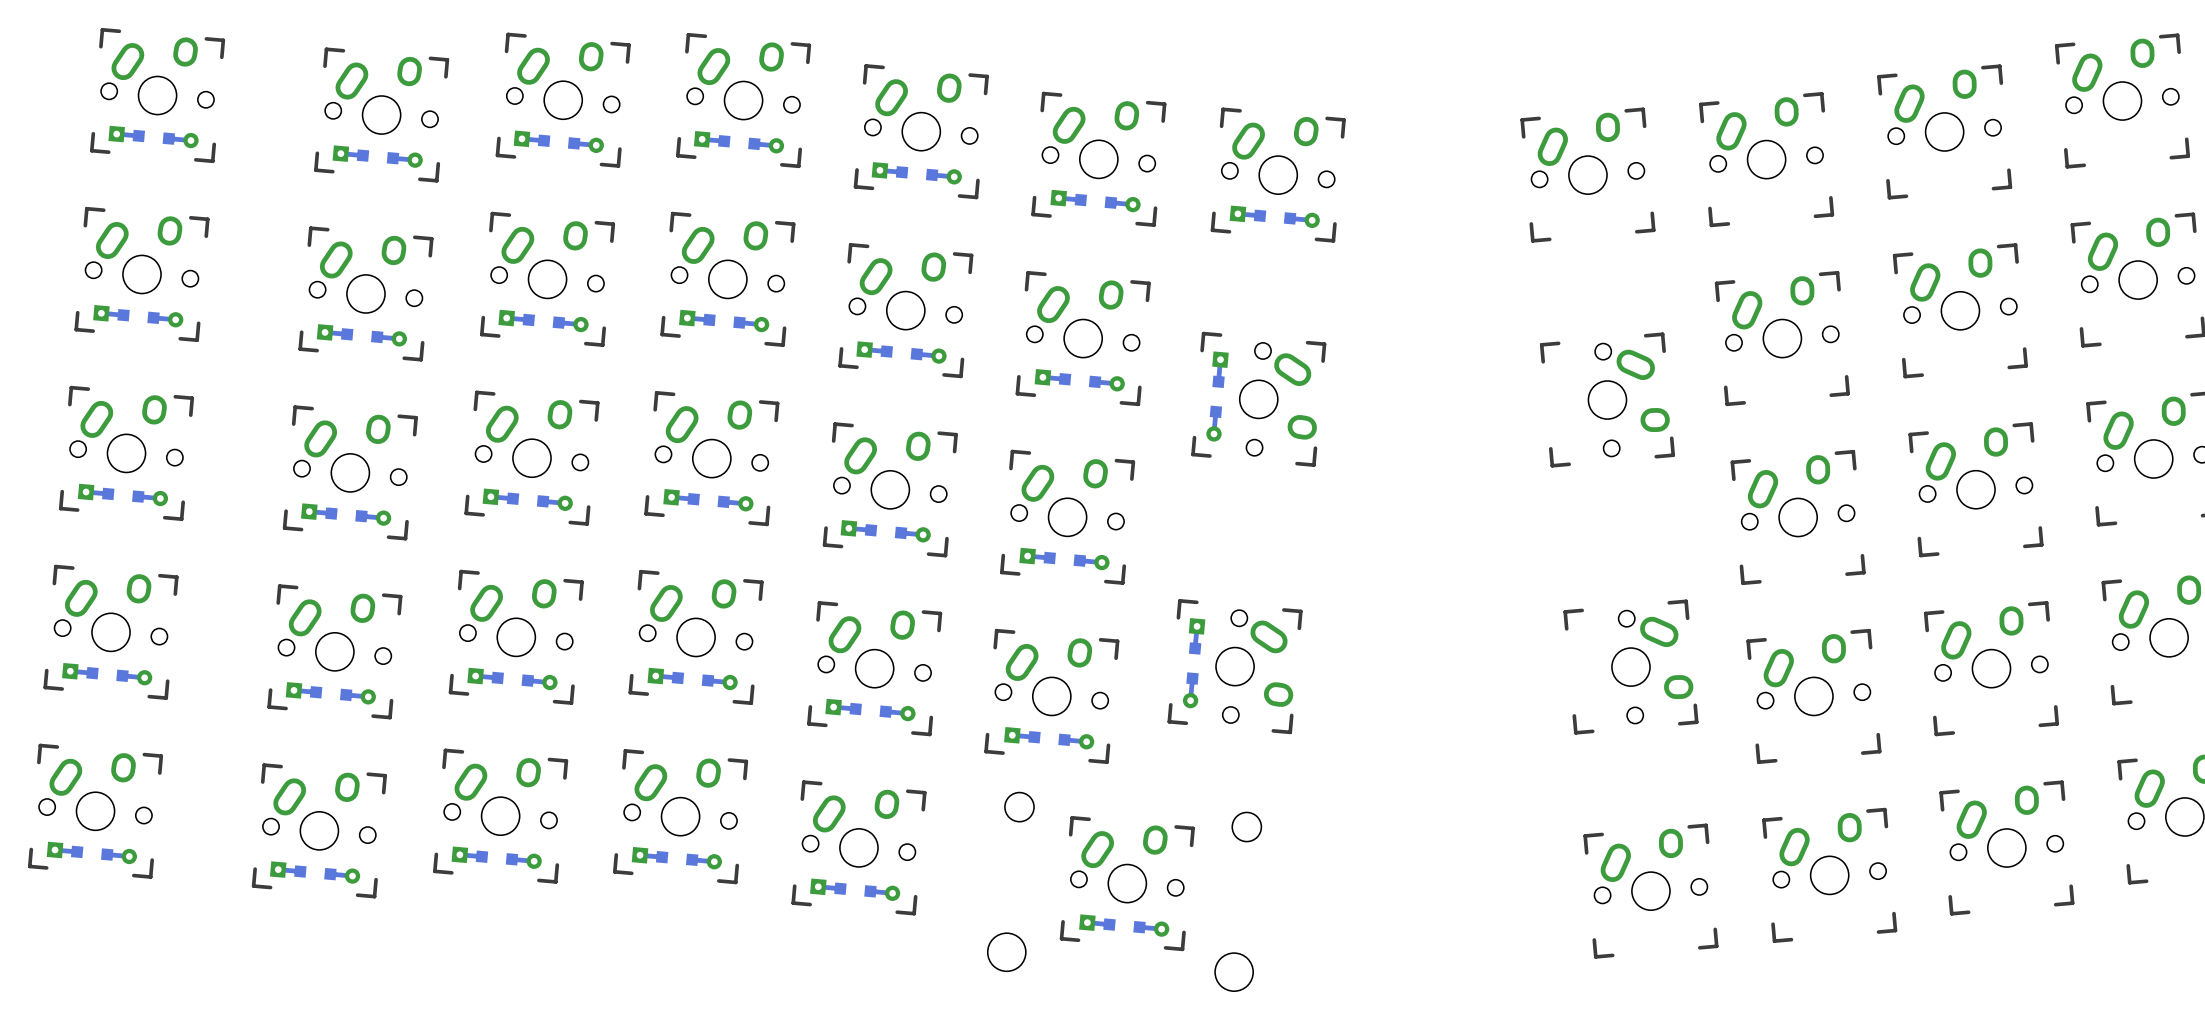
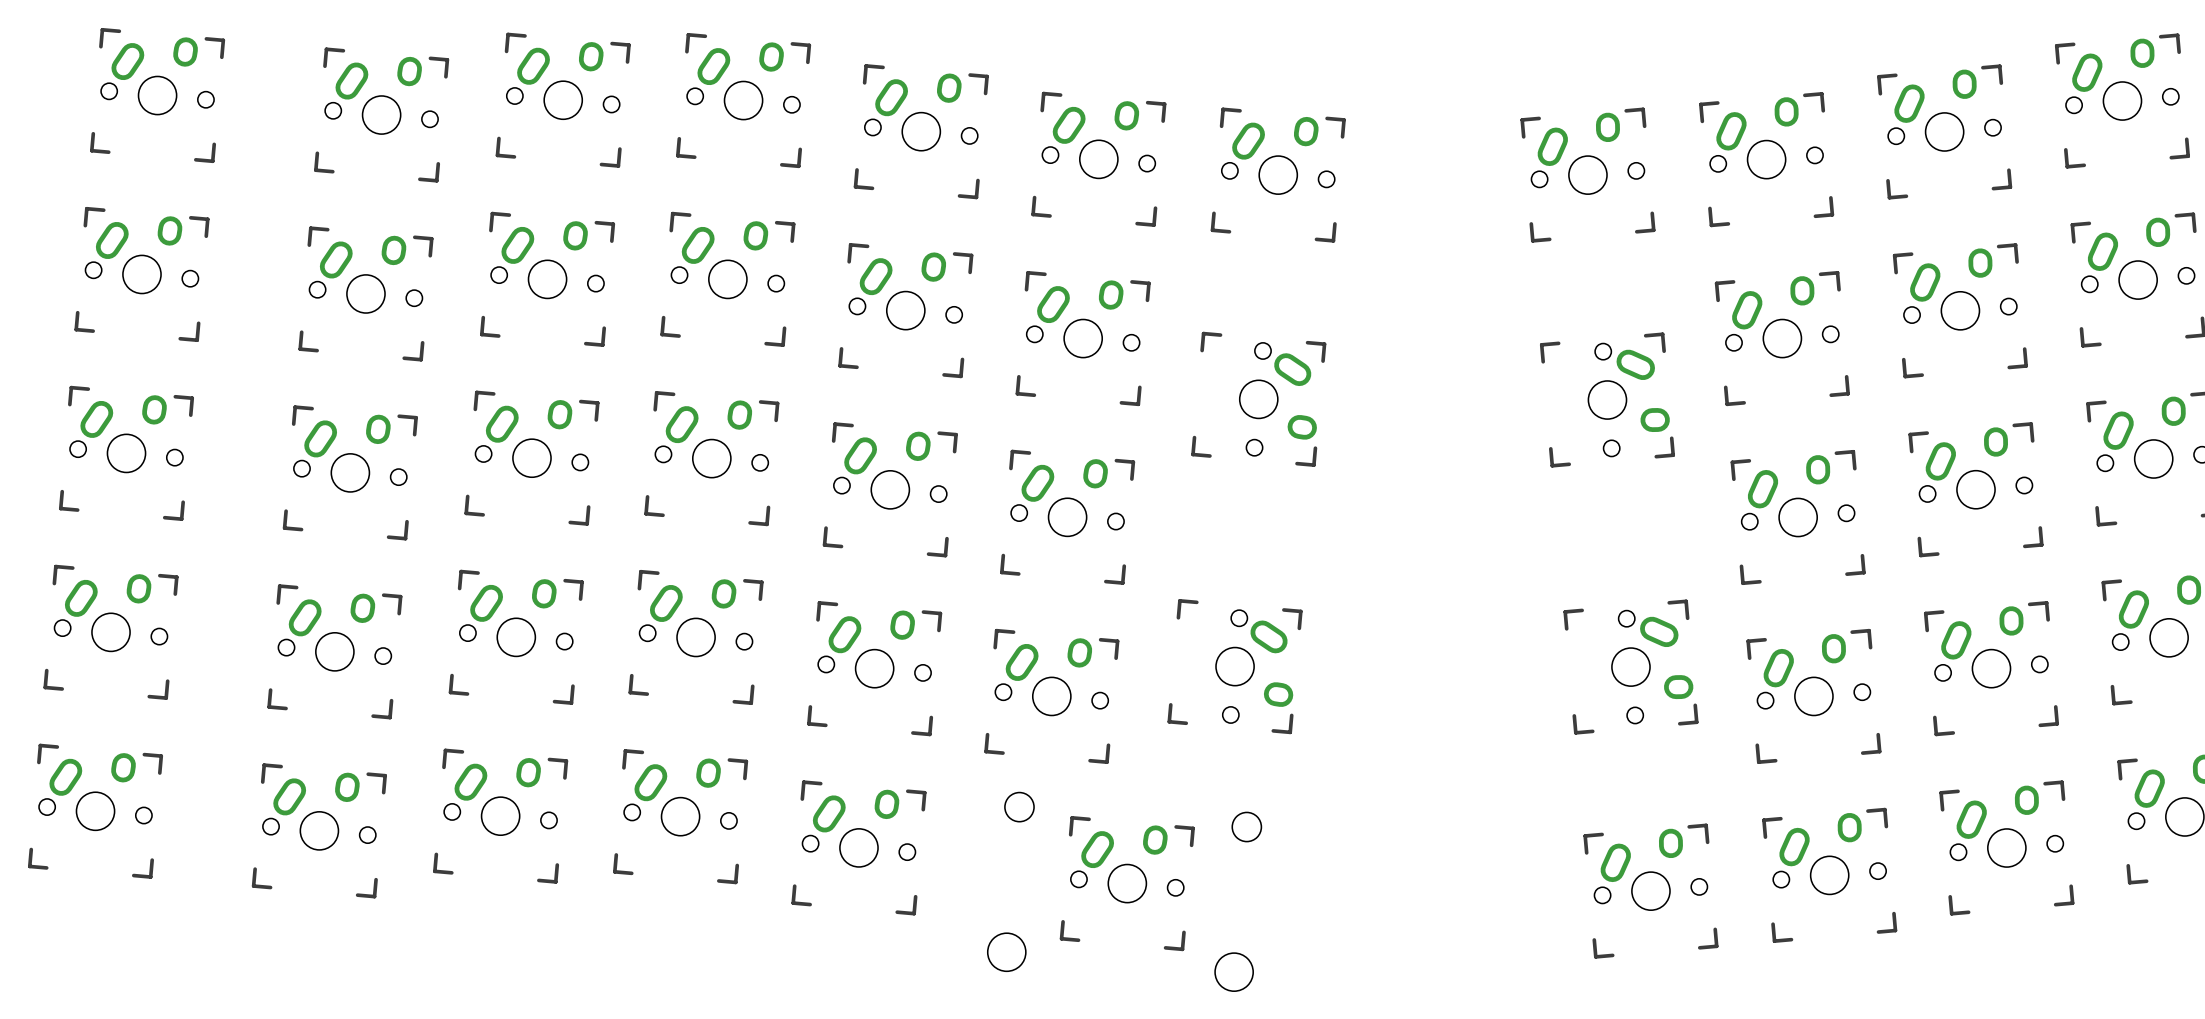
part: (153, 136) -> none
part: (558, 141) -> none
part: (738, 142) -> none
part: (377, 156) -> none
part: (916, 173) -> none
part: (1095, 201) -> none
part: (1274, 216) -> none
part: (138, 316) -> none
part: (543, 320) -> none
part: (724, 320) -> none
part: (361, 335) -> none
part: (901, 352) -> none
part: (1079, 380) -> none
part: (1217, 396) -> none
part: (122, 494) -> none
part: (527, 499) -> none
part: (708, 500) -> none
part: (346, 514) -> none
part: (885, 531) -> none
part: (1064, 559) -> none
part: (1194, 663) -> none
part: (107, 674) -> none
part: (512, 678) -> none
part: (692, 678) -> none
part: (330, 693) -> none
part: (870, 710) -> none
part: (1049, 738) -> none
part: (91, 852) -> none
part: (496, 857) -> none
part: (676, 858) -> none
part: (315, 872) -> none
part: (855, 889) -> none
part: (1124, 925) -> none

